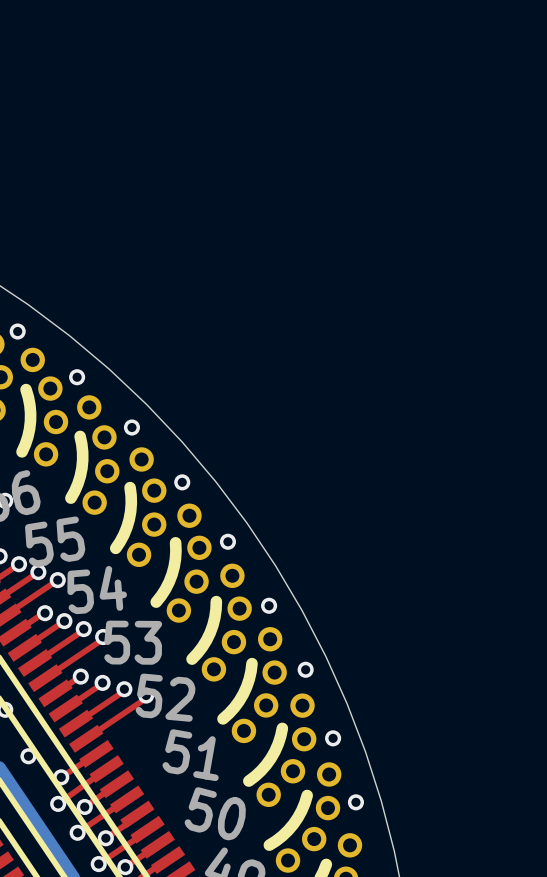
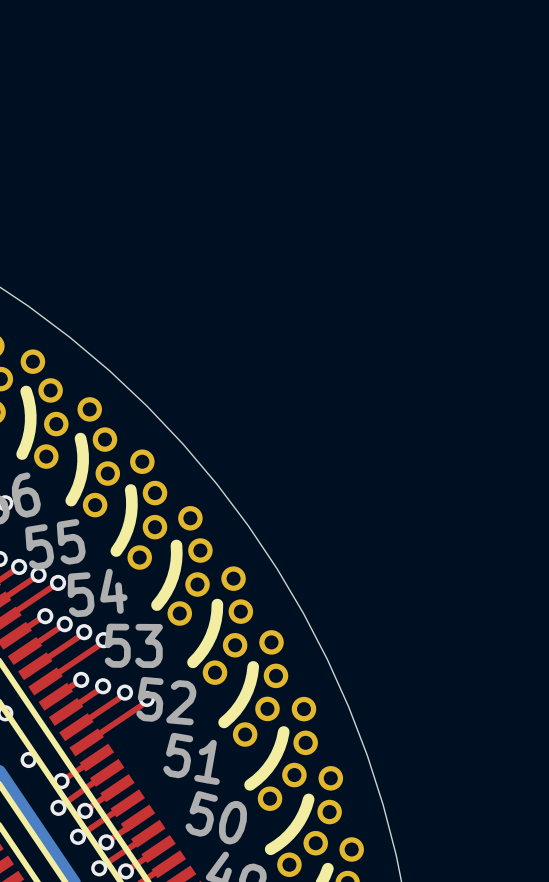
via: (17, 331) -> none
via: (77, 377) -> none
via: (131, 427) -> none
via: (182, 482) -> none
via: (227, 541) -> none
via: (269, 605) -> none
via: (305, 669) -> none
via: (333, 738) -> none
via: (355, 802) -> none

